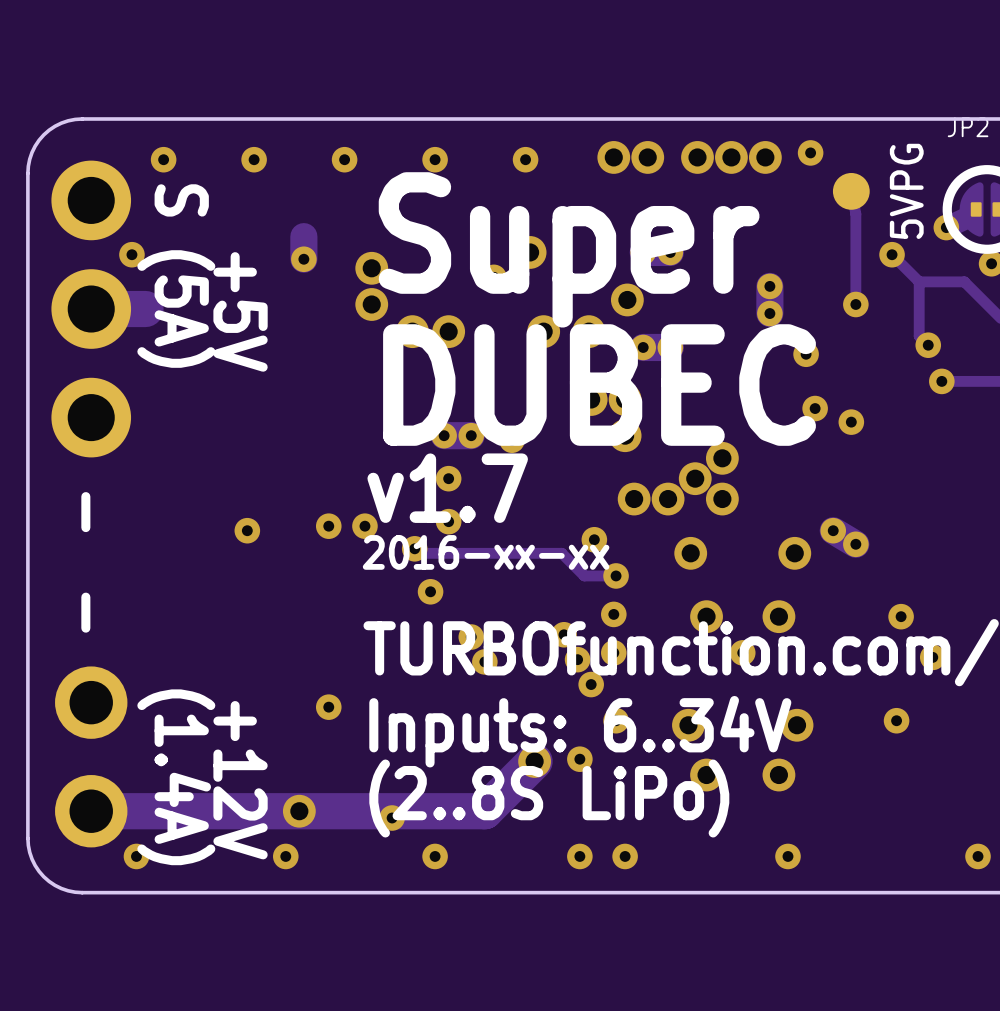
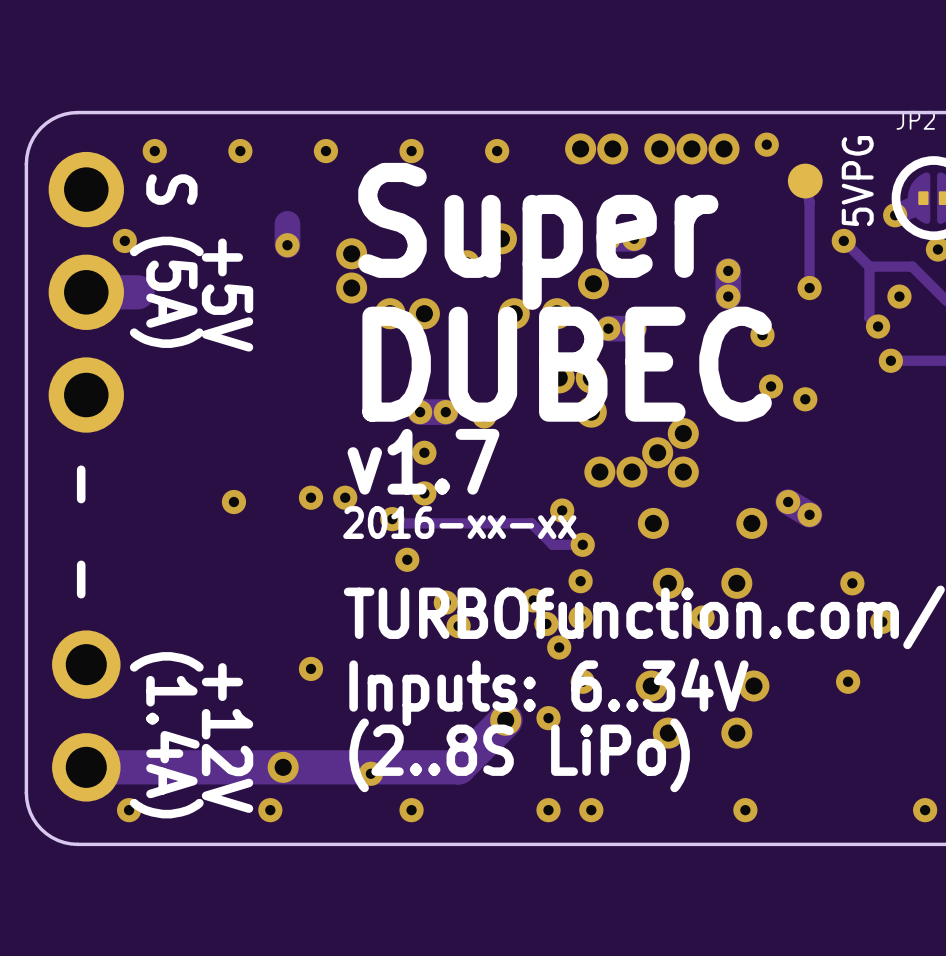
via: none -> (899, 296)

